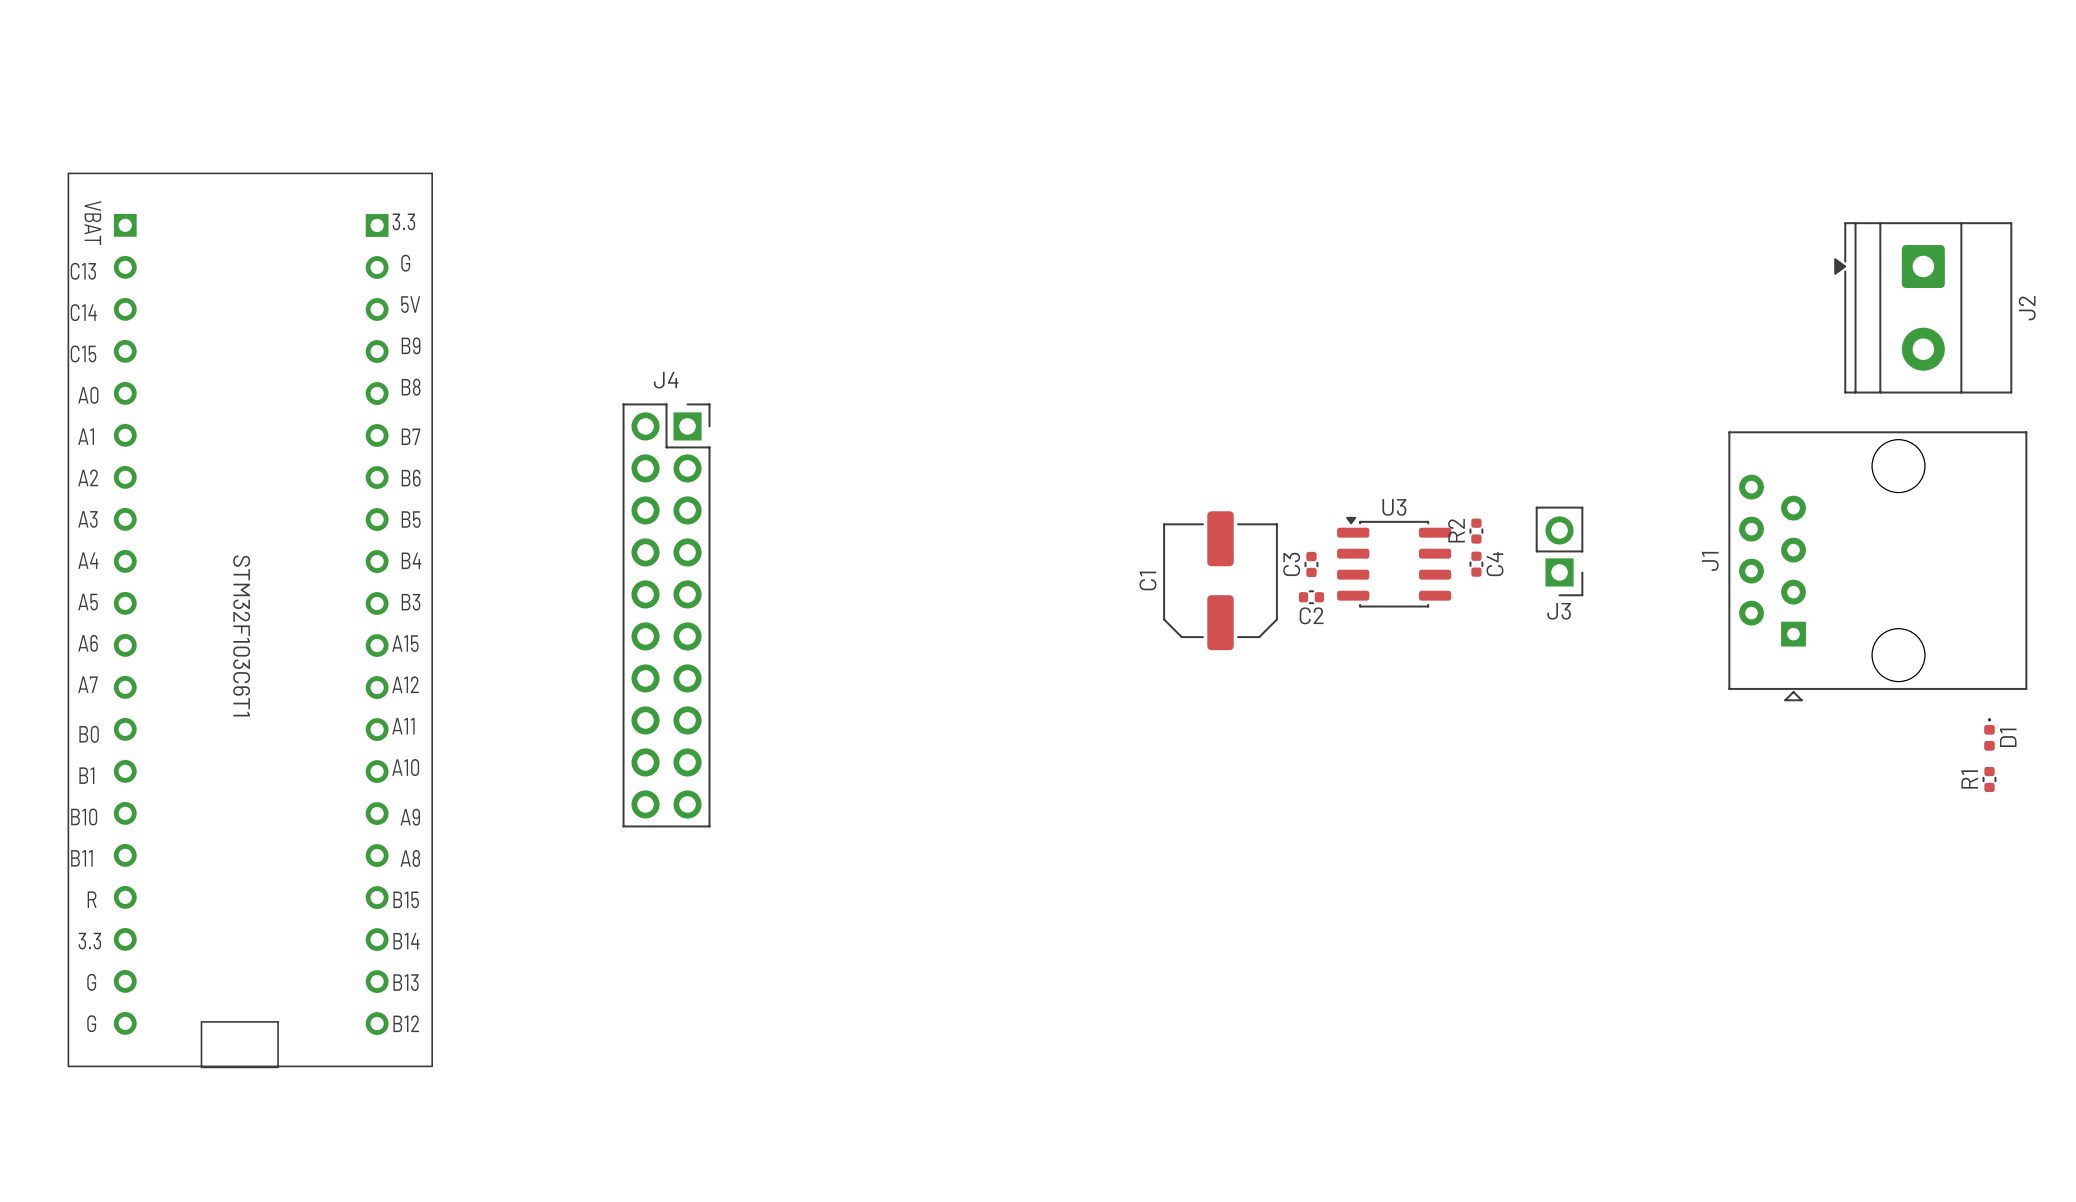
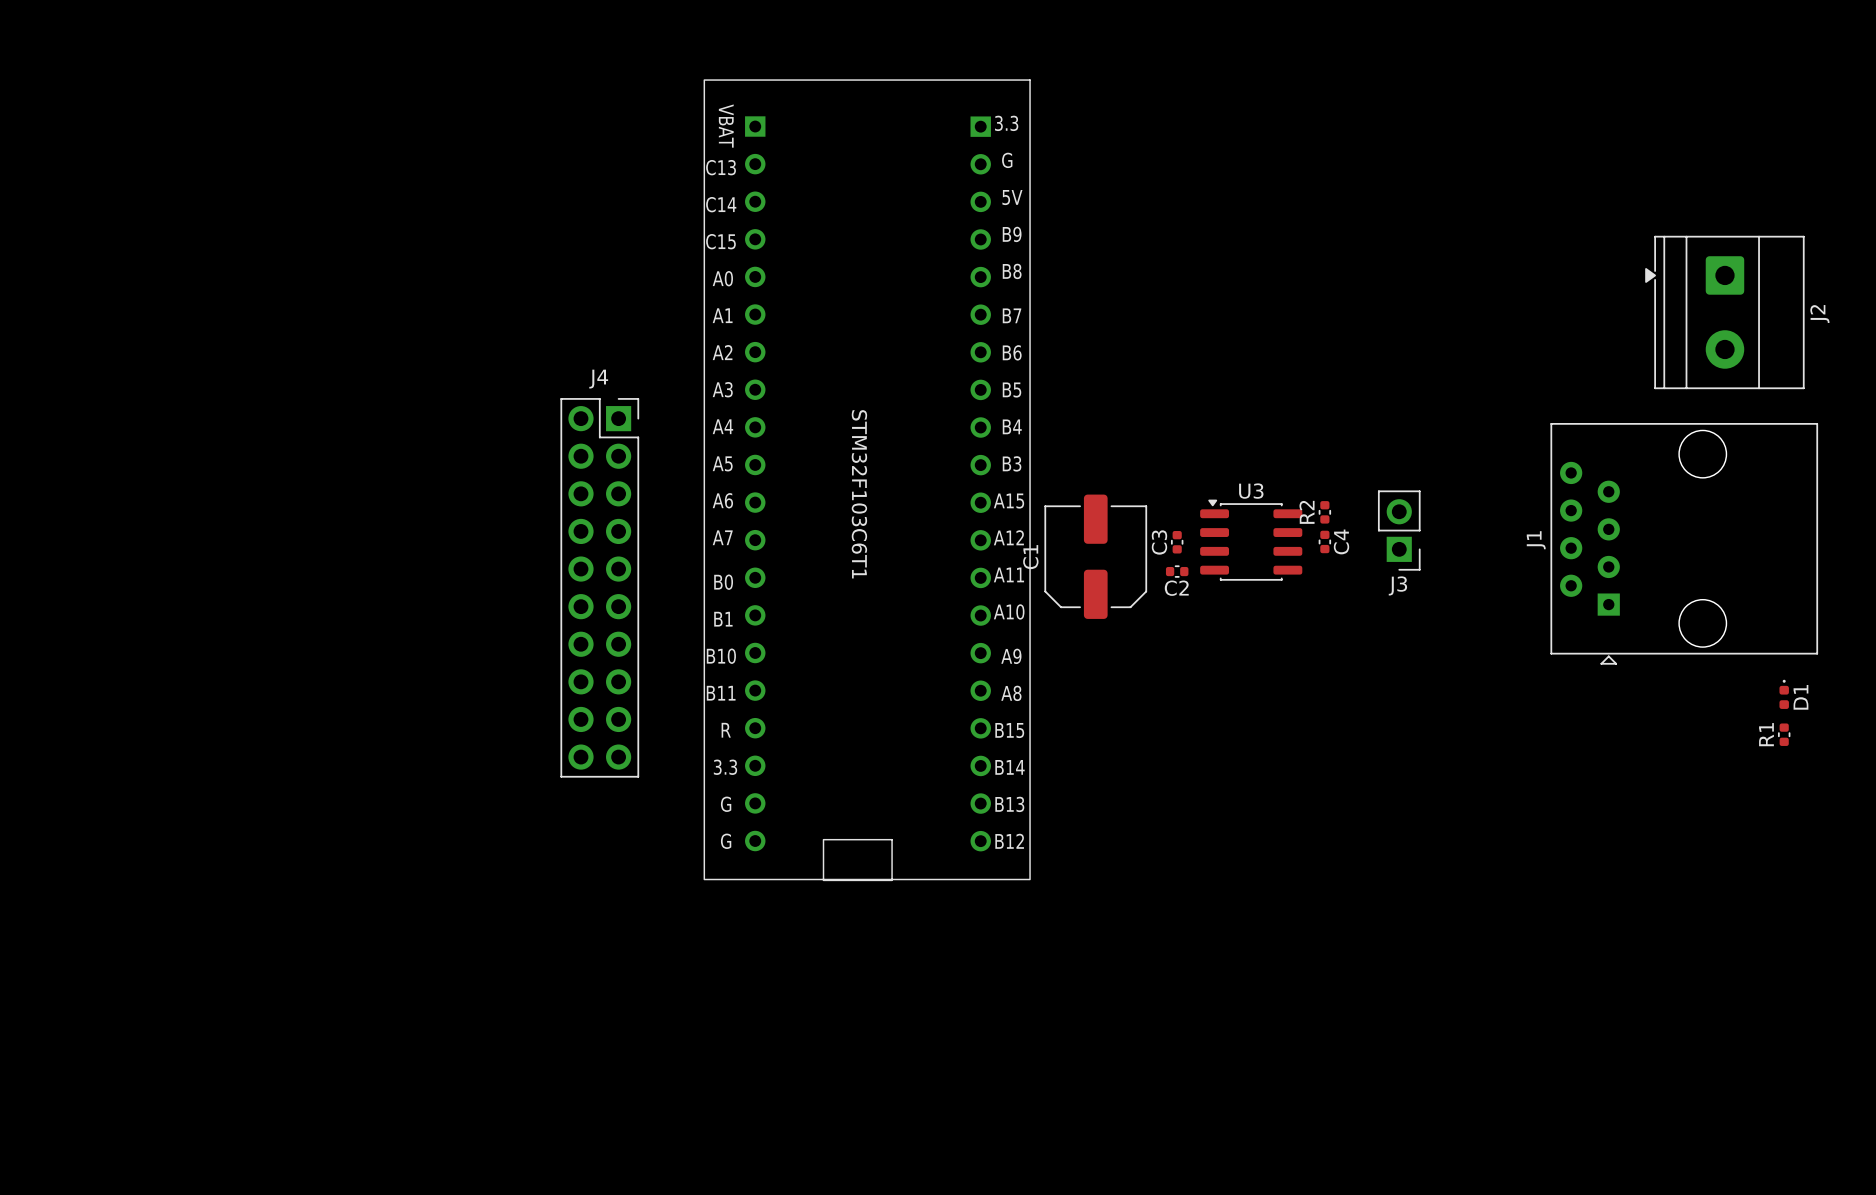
STM32F103C6T1 position: (250, 620) -> (867, 480)

